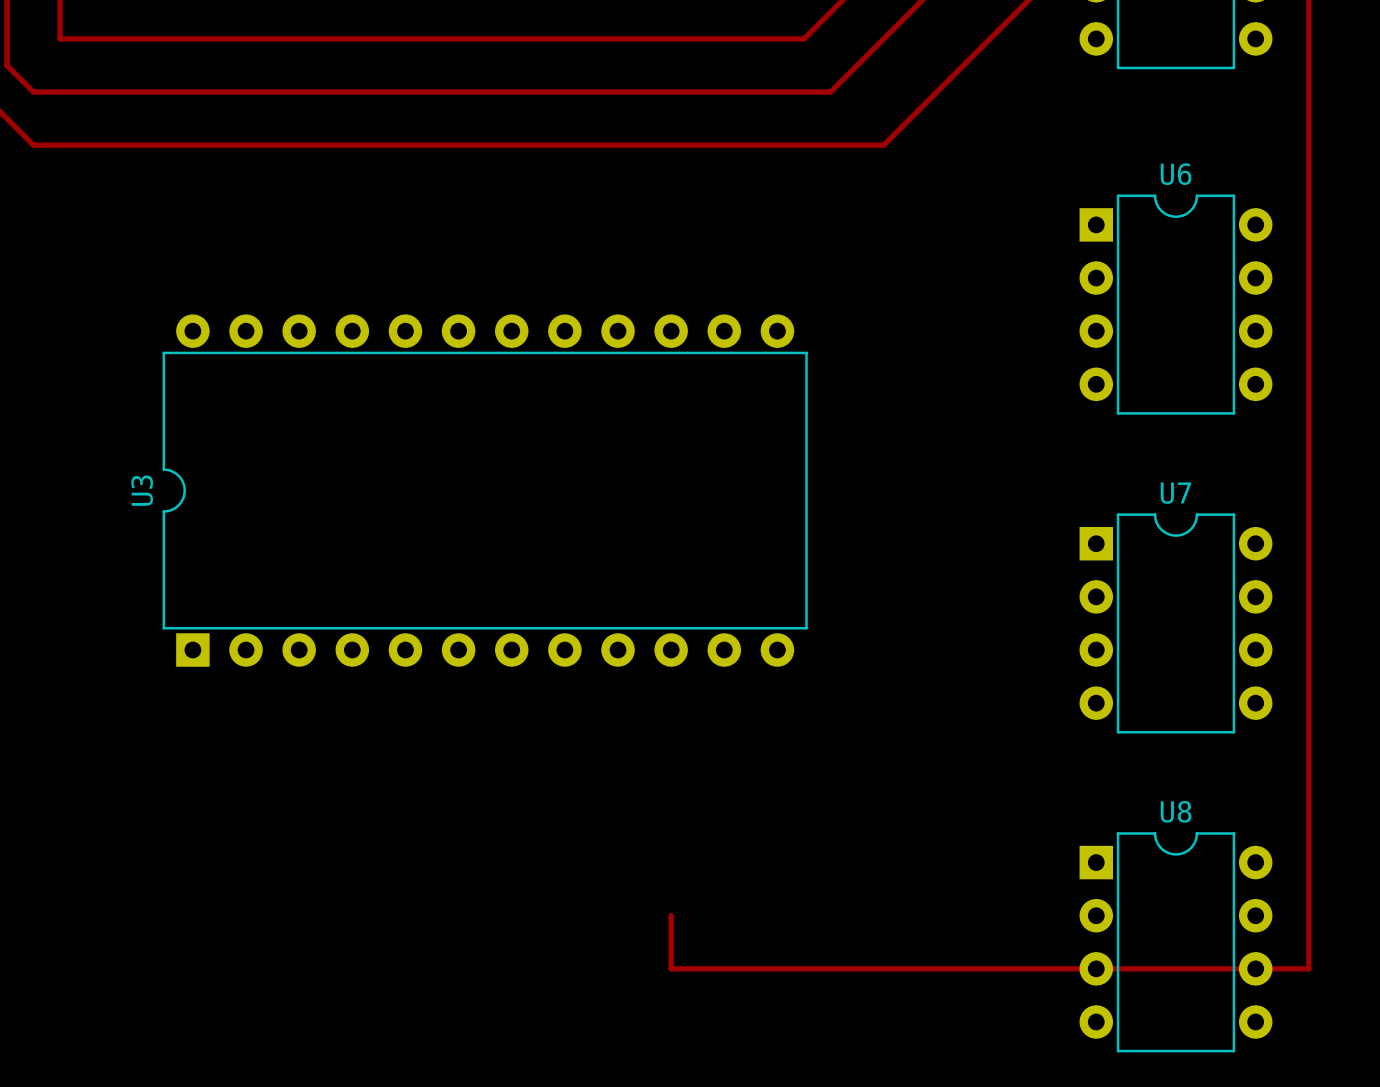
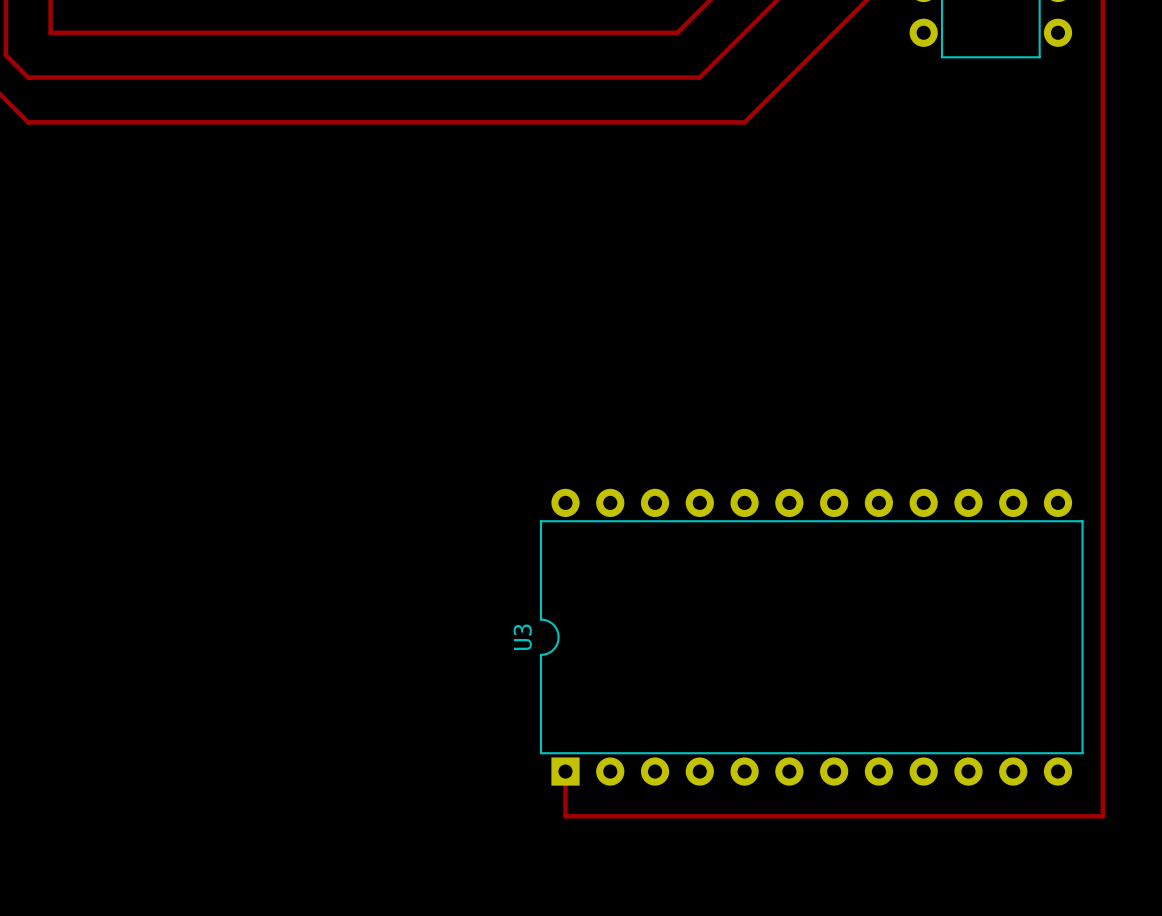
U6: (1175, 304) -> none
U3 position: (485, 490) -> (811, 637)
U7: (1175, 623) -> none
U8: (1175, 942) -> none

